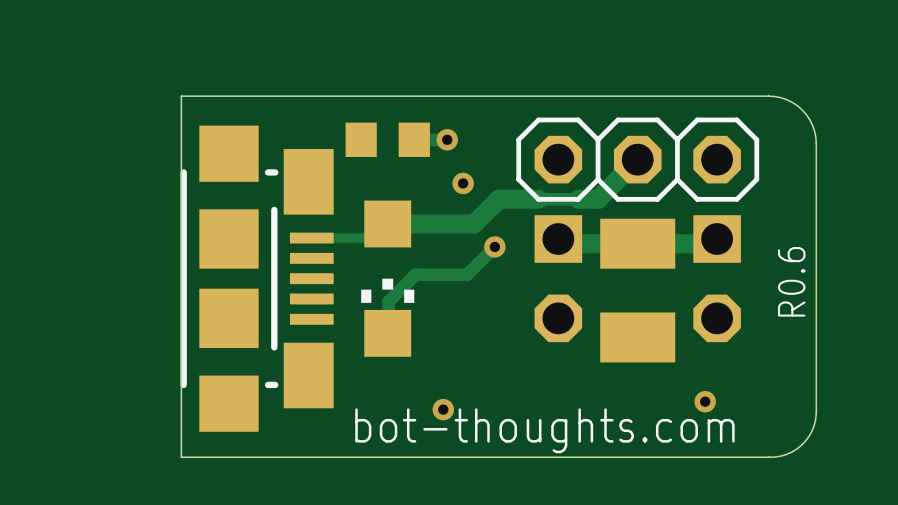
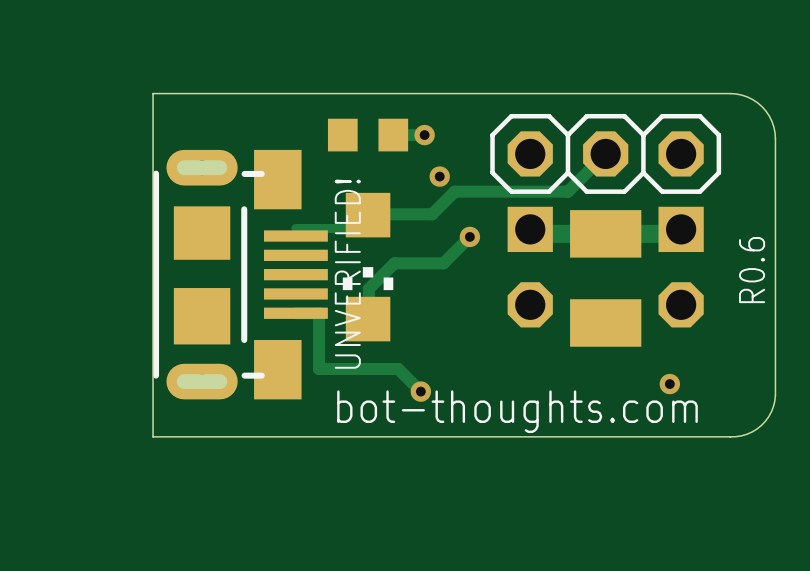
board edge: (181, 96) (181, 457) -> (171, 93) (153, 93) (153, 436) (171, 436)
part footprint: [180, 125, 334, 432] -> [153, 149, 328, 400]
track width: thick (637, 159) (598, 199) (578, 199) -> thin (605, 153) (567, 191) (549, 191)
track: (498, 199) (474, 224) (387, 224) -> (473, 191) (454, 191) (432, 214) (368, 215)
track width: thick (498, 199) (538, 199) -> thin (473, 191) (511, 191)
track: none -> (295, 313) (319, 313) (319, 368) (398, 368) (420, 391)

